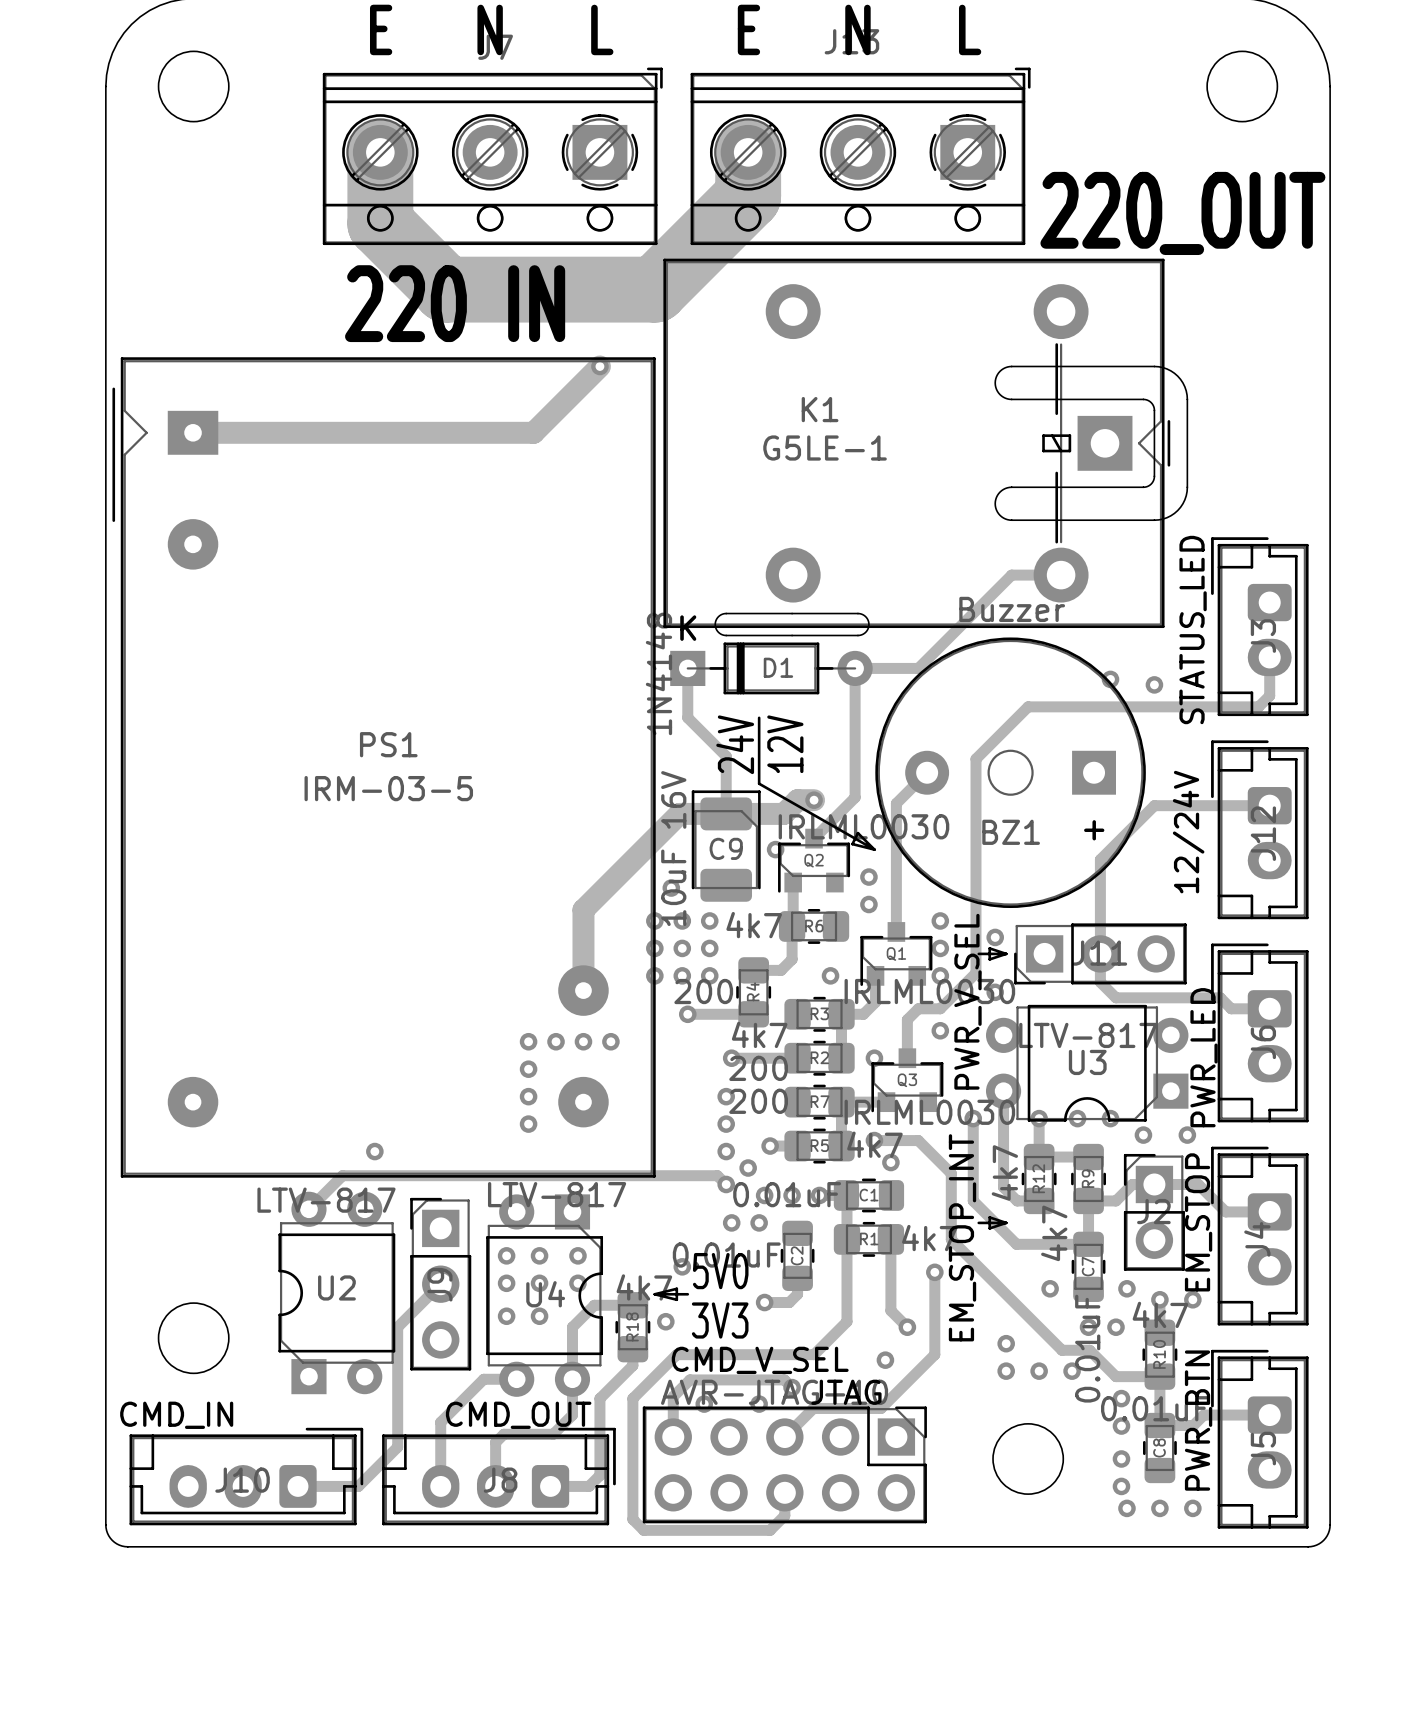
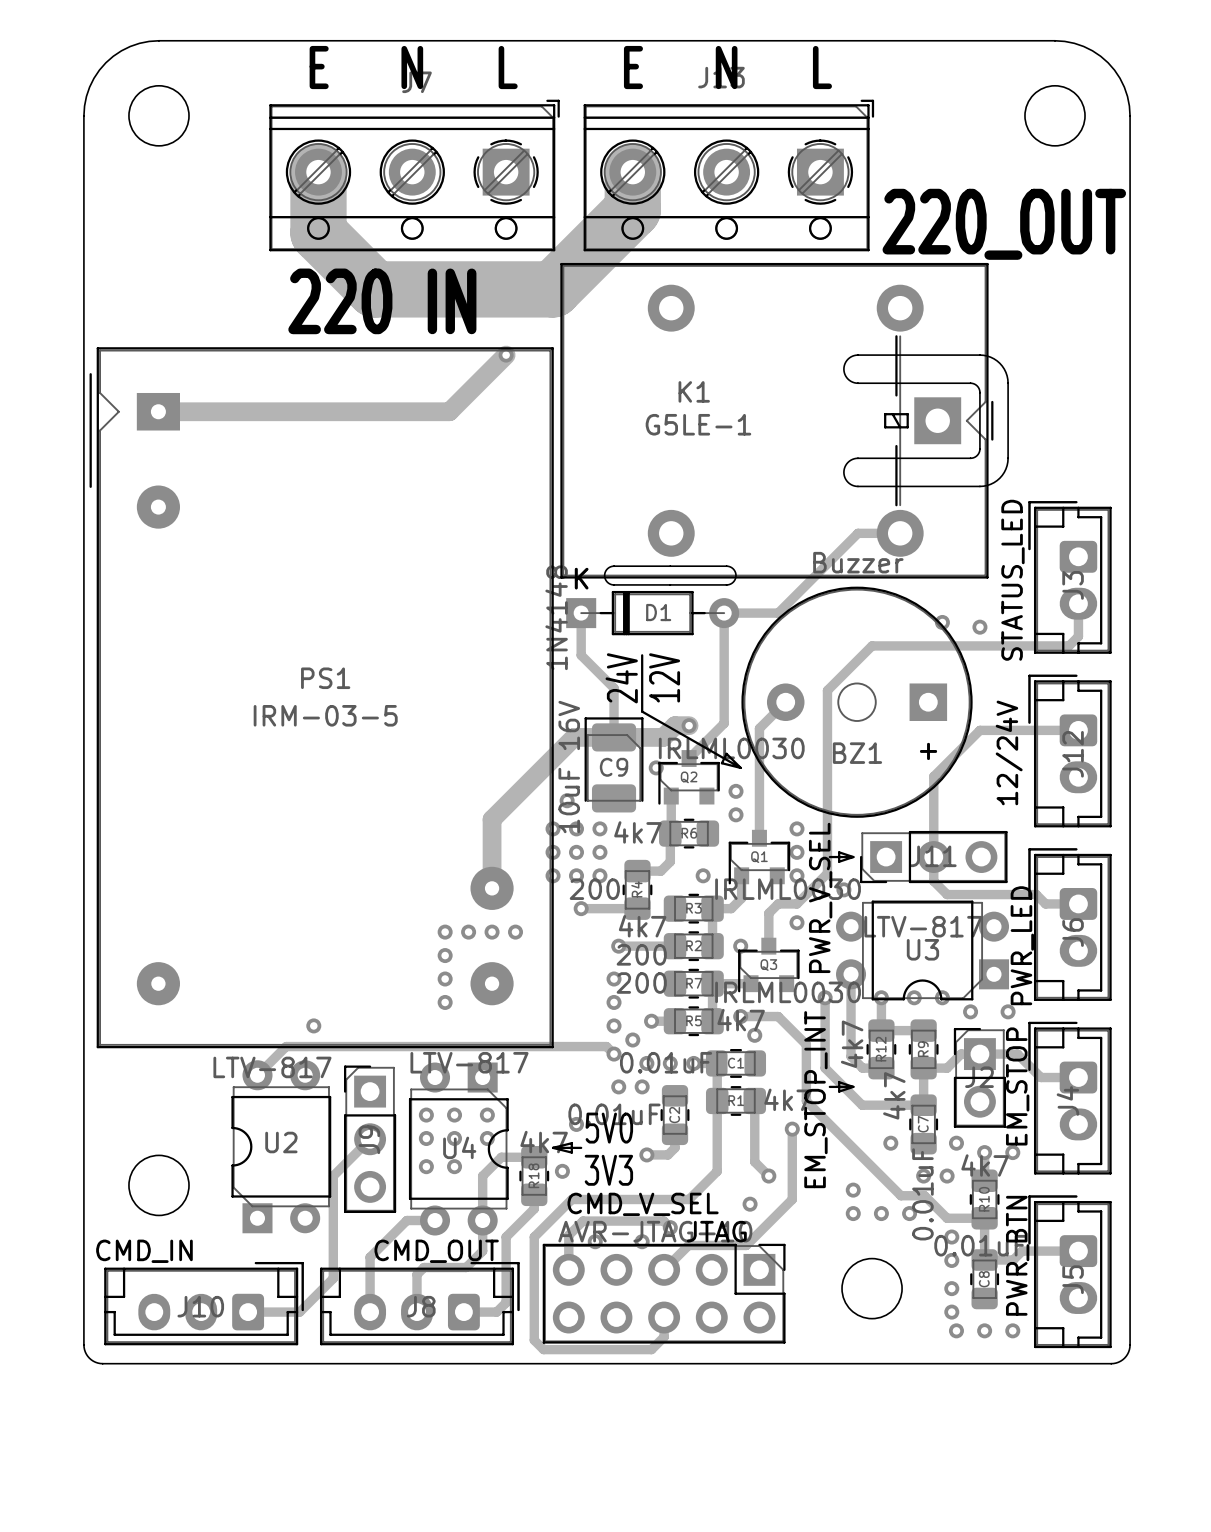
via: (995, 937) -> none

